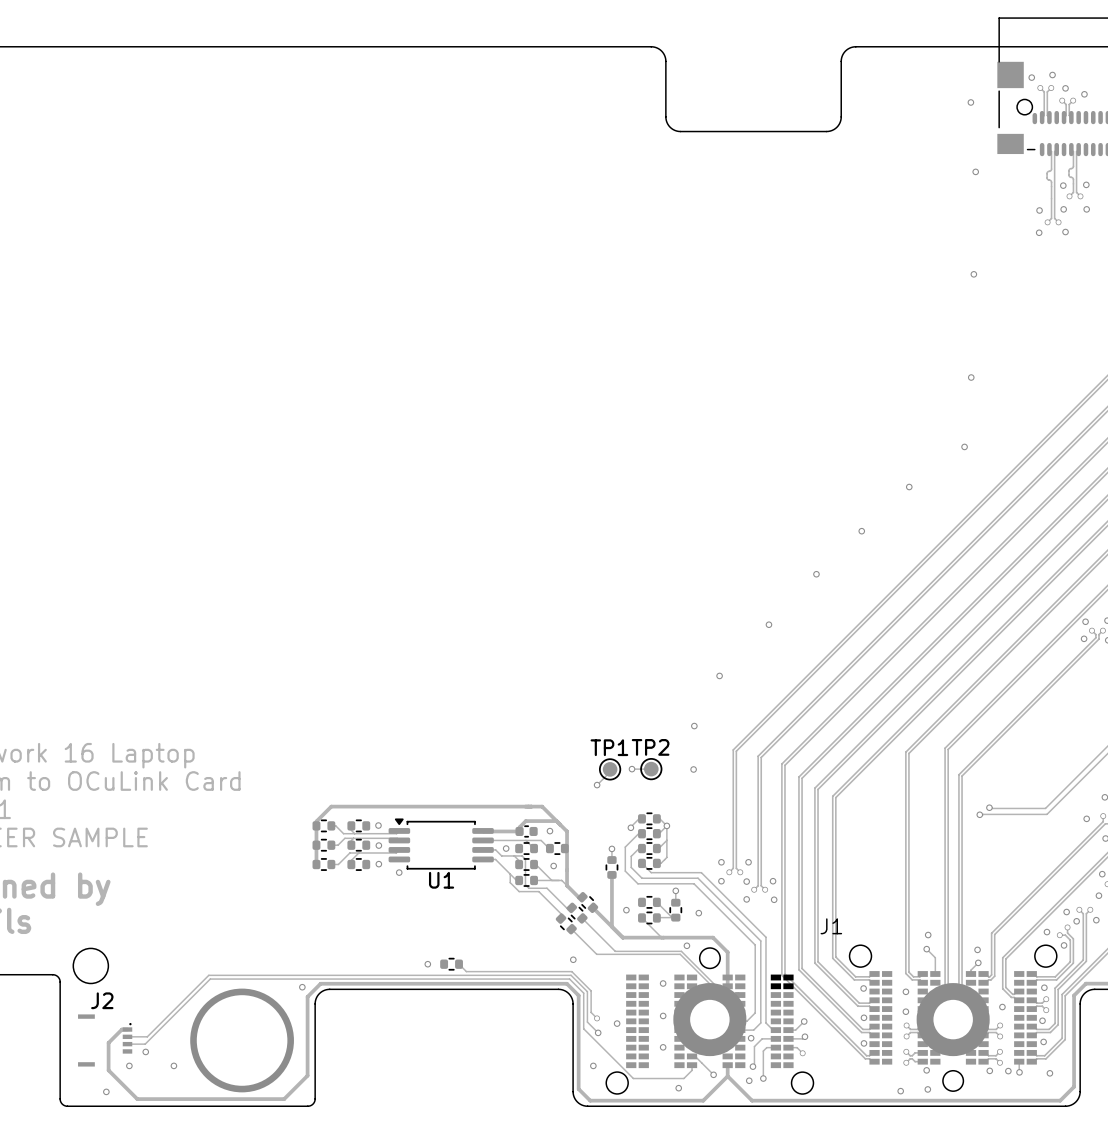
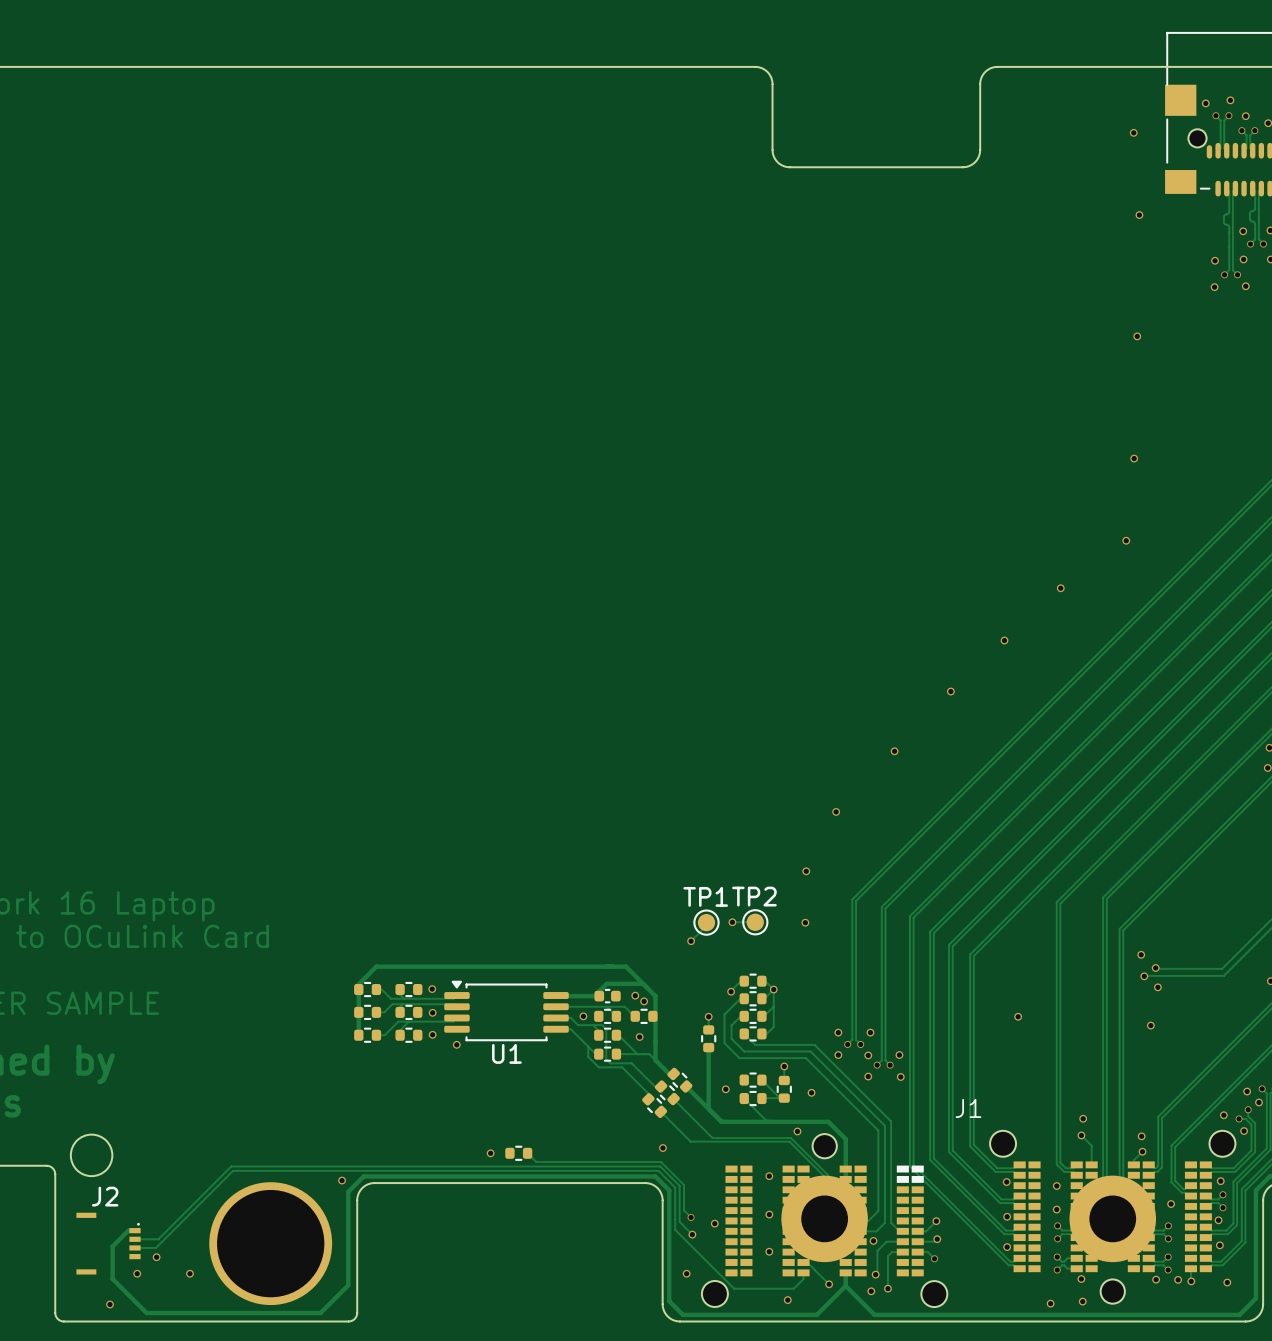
via: none -> (1141, 954)
via: none -> (1157, 987)
via: none -> (644, 1001)
via: none -> (1018, 1016)
via: none -> (1150, 1025)

